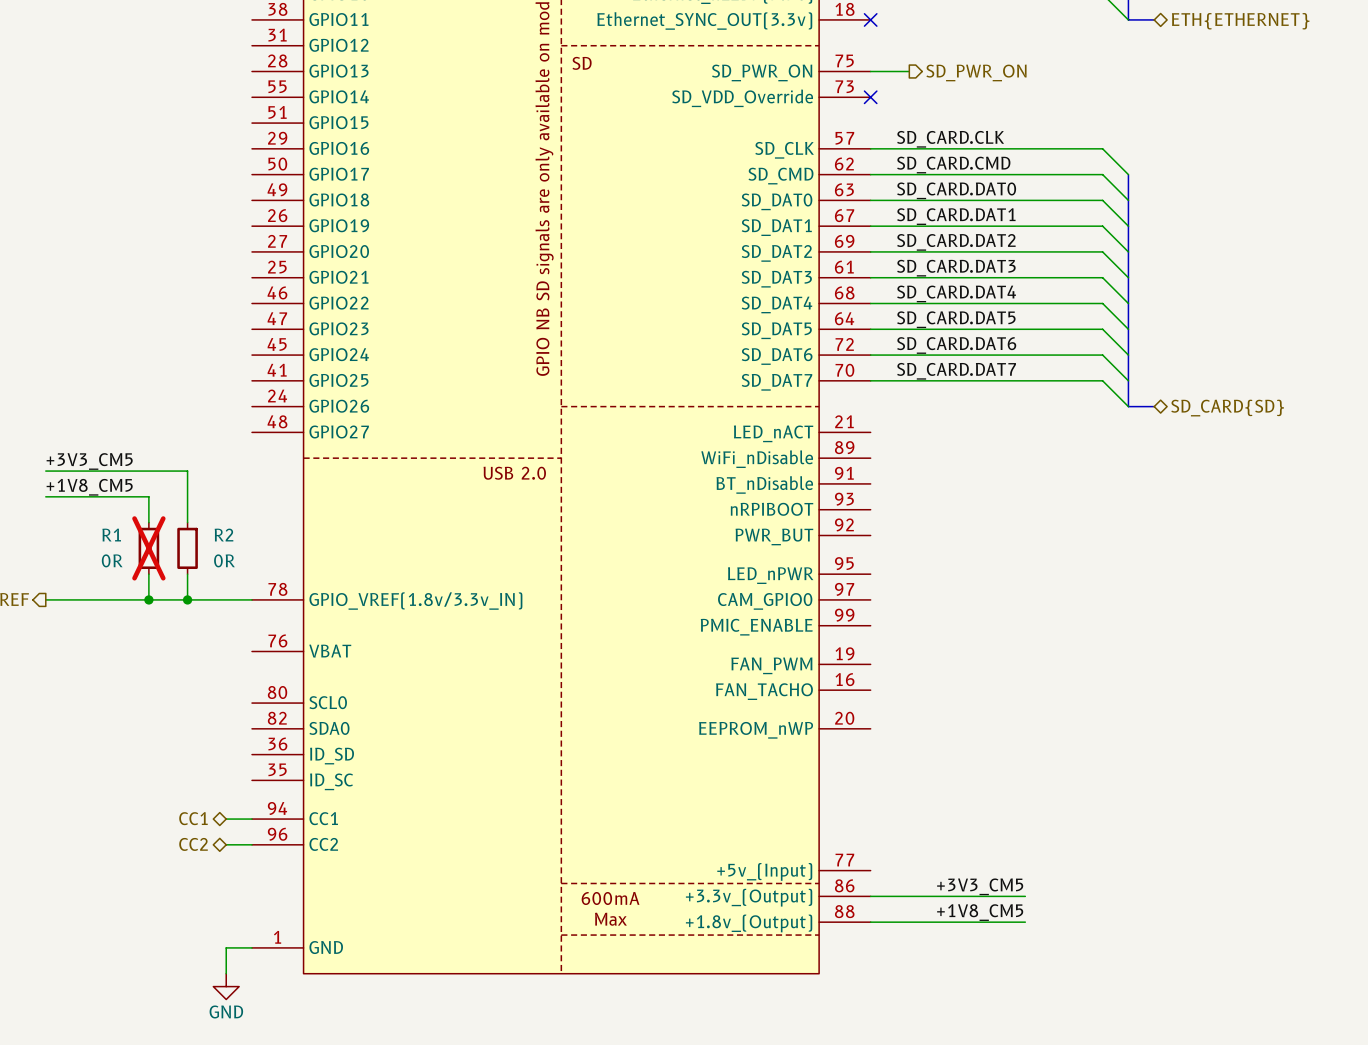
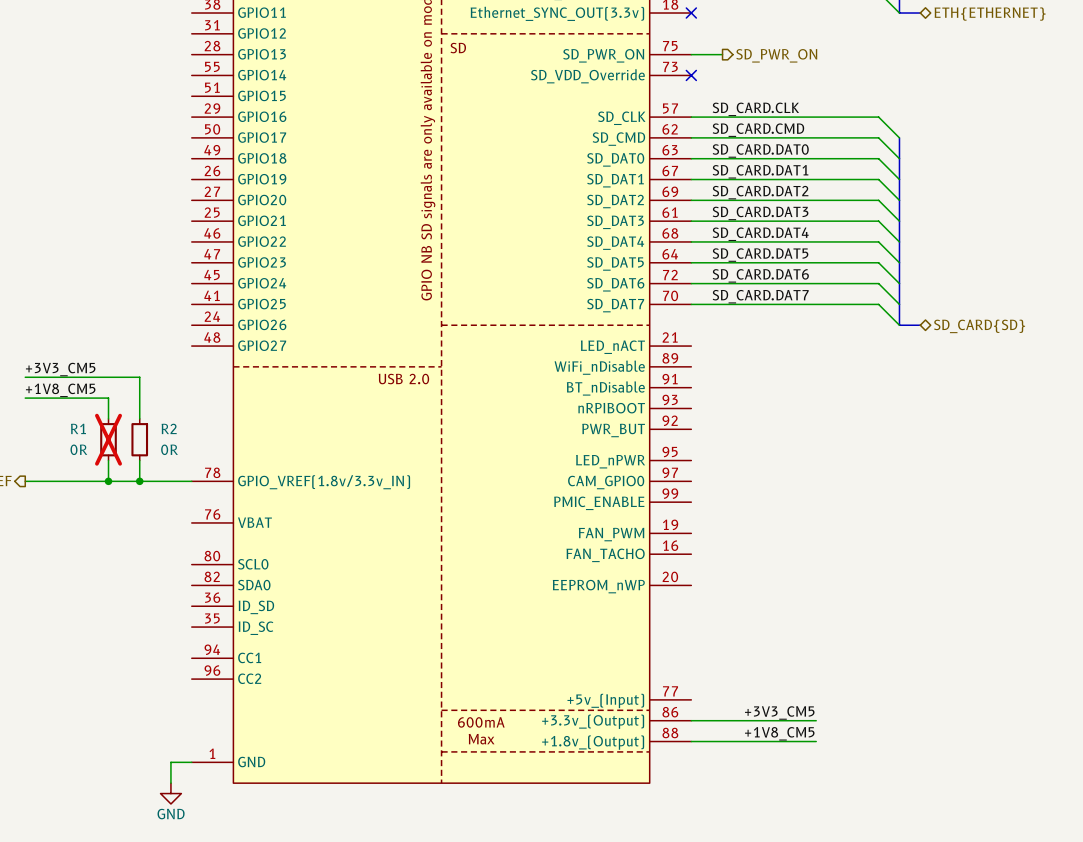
hierarchical label: CC1 (193, 818) -> none
wire: (226, 819) (252, 819) -> none
hierarchical label: CC2 (193, 844) -> none
wire: (226, 844) (252, 844) -> none

